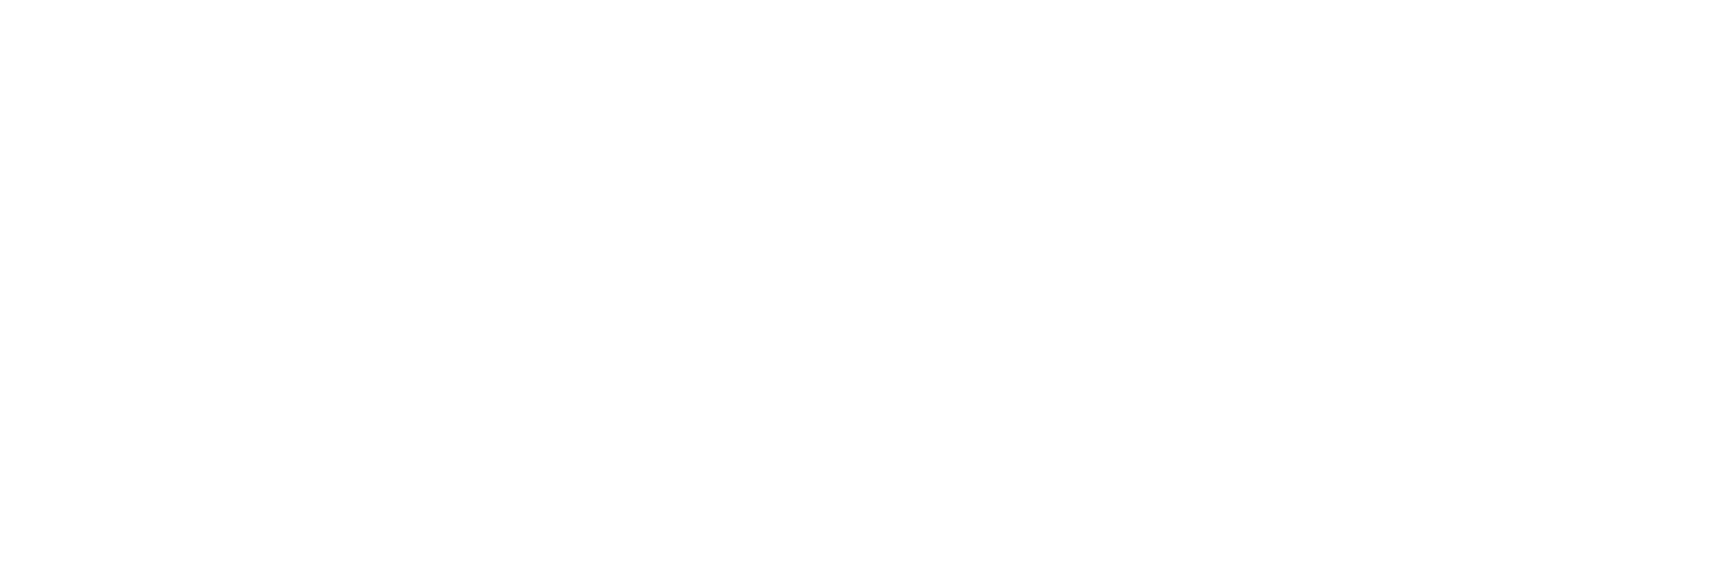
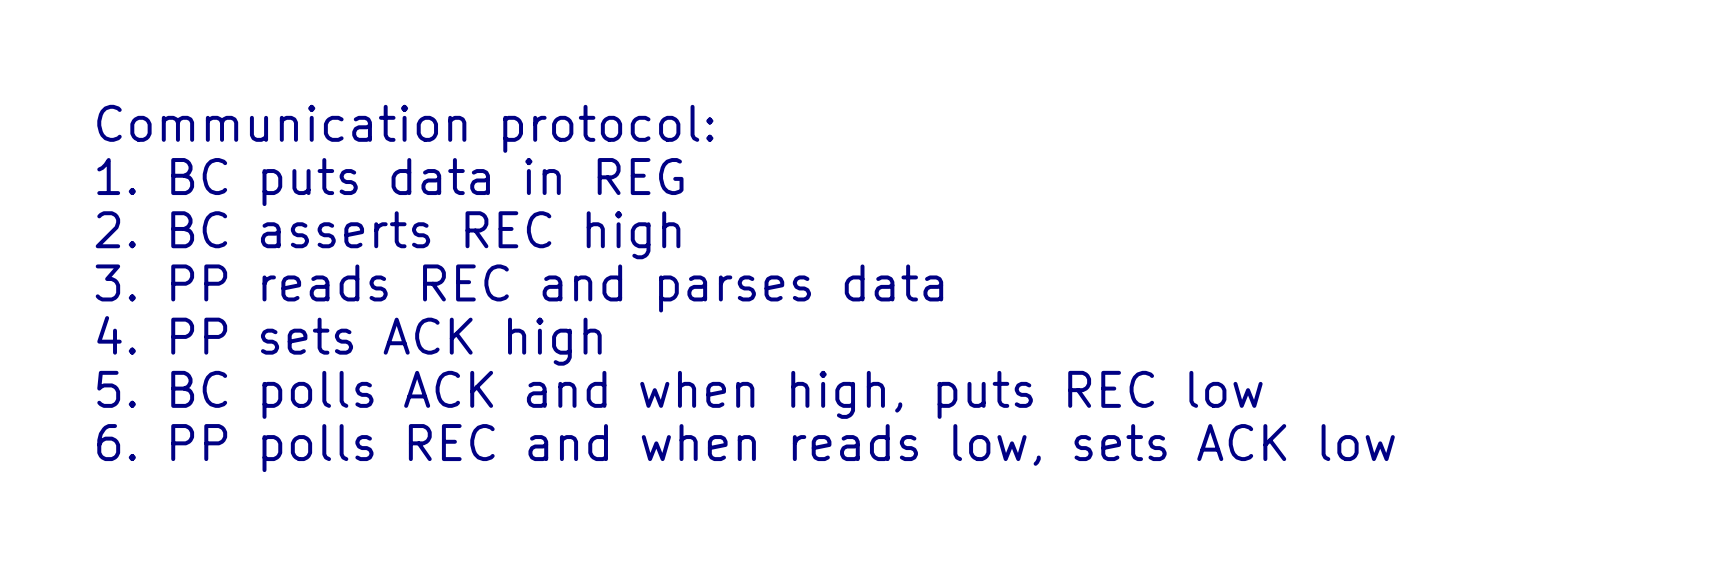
text: none -> Communication protocol: (405, 128)
text: none -> 1. BC puts data in REG (390, 182)
text: none -> 2. BC asserts REC high (388, 235)
text: none -> 3. PP reads REC and parses data (519, 288)
text: none -> 4. PP sets ACK high (349, 340)
text: none -> 5. BC polls ACK and when high, puts REC low (679, 394)
text: none -> 6. PP polls REC and when reads low, sets ACK low (746, 448)

